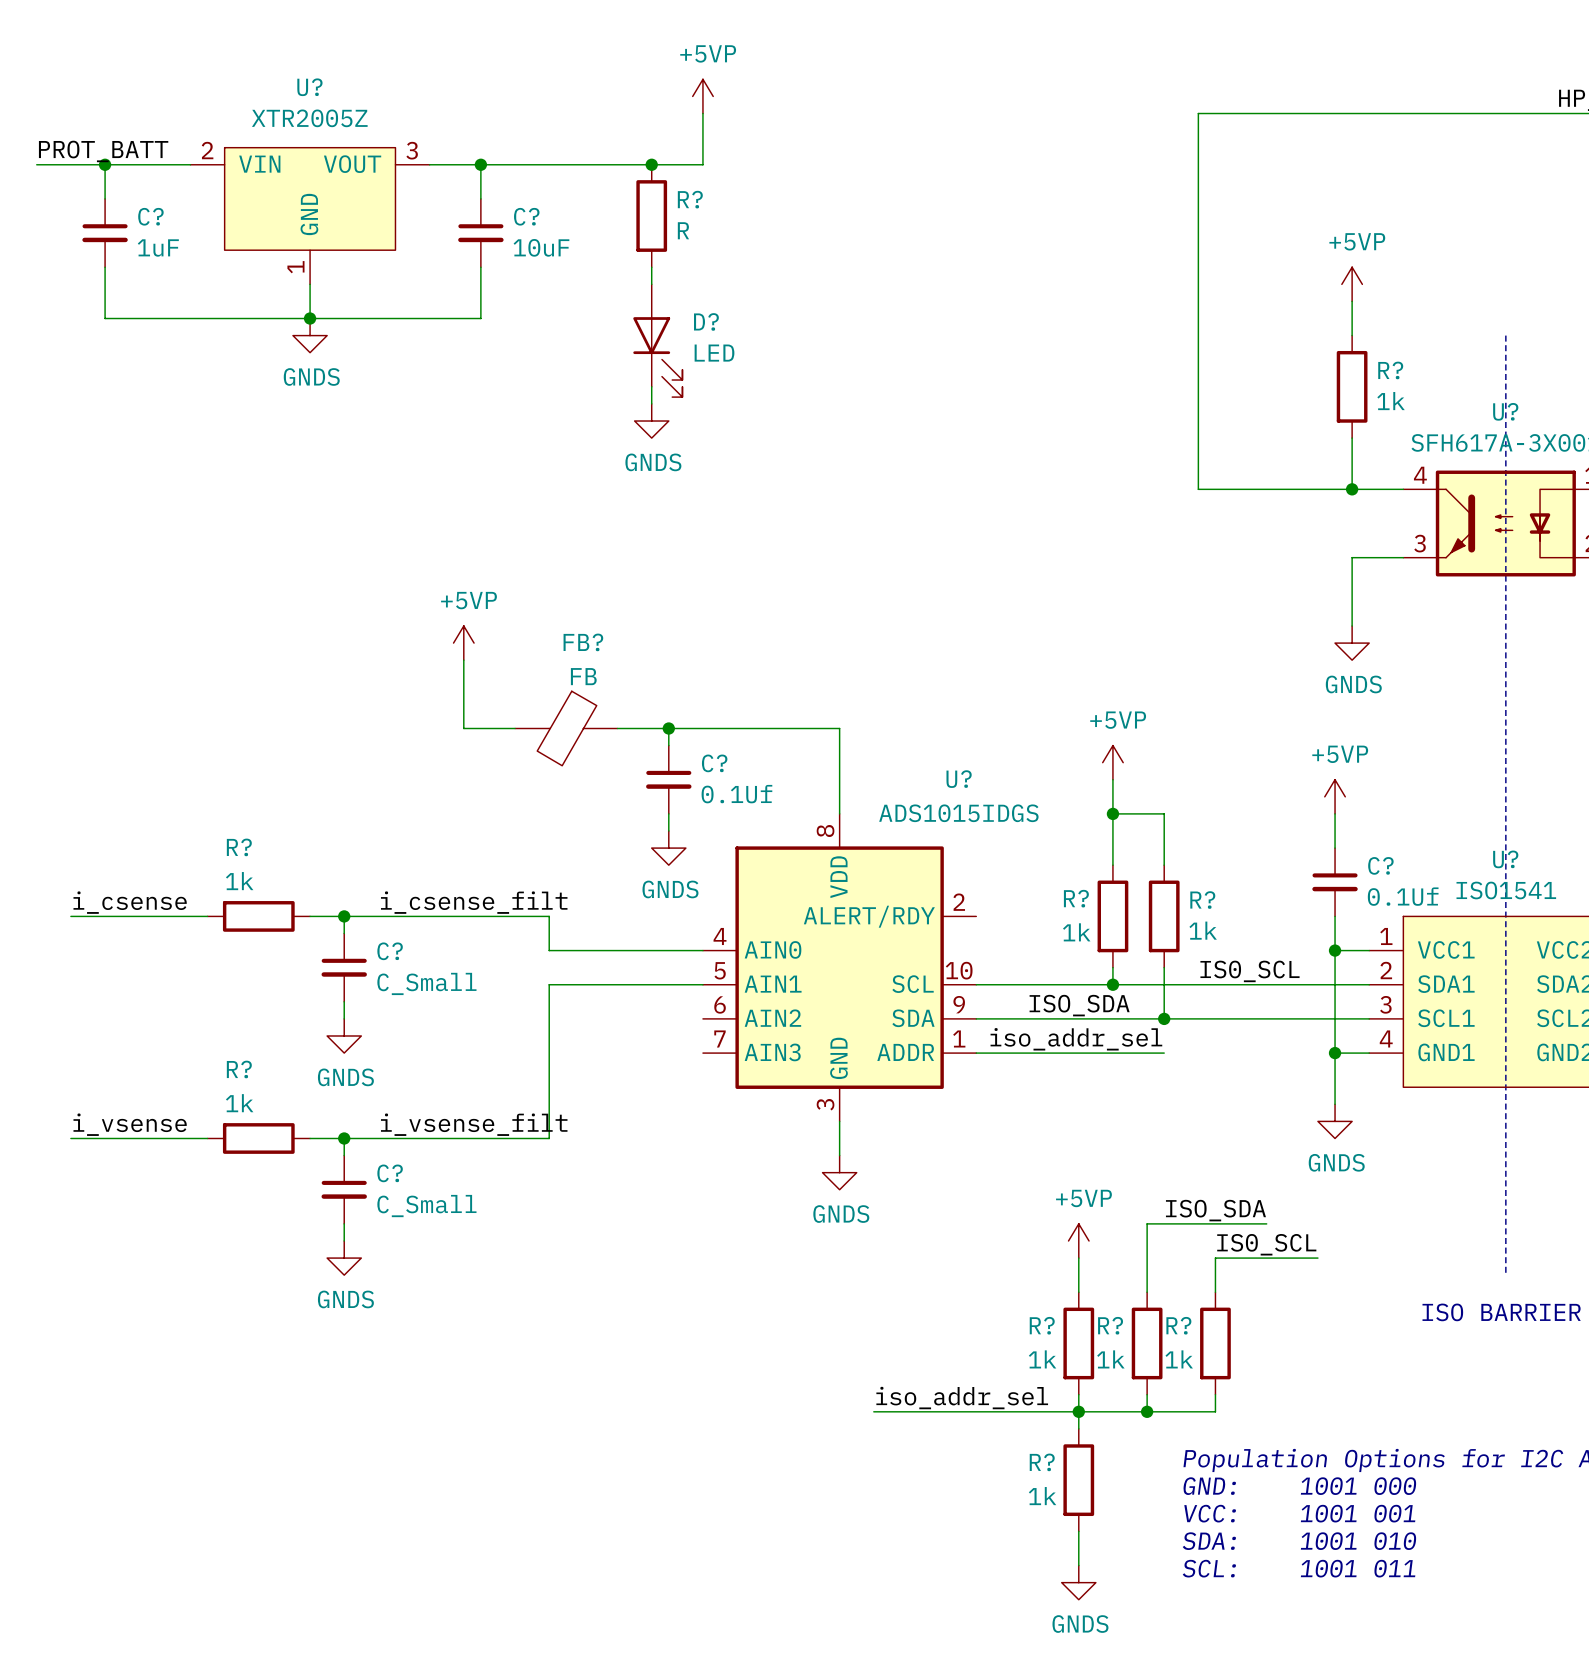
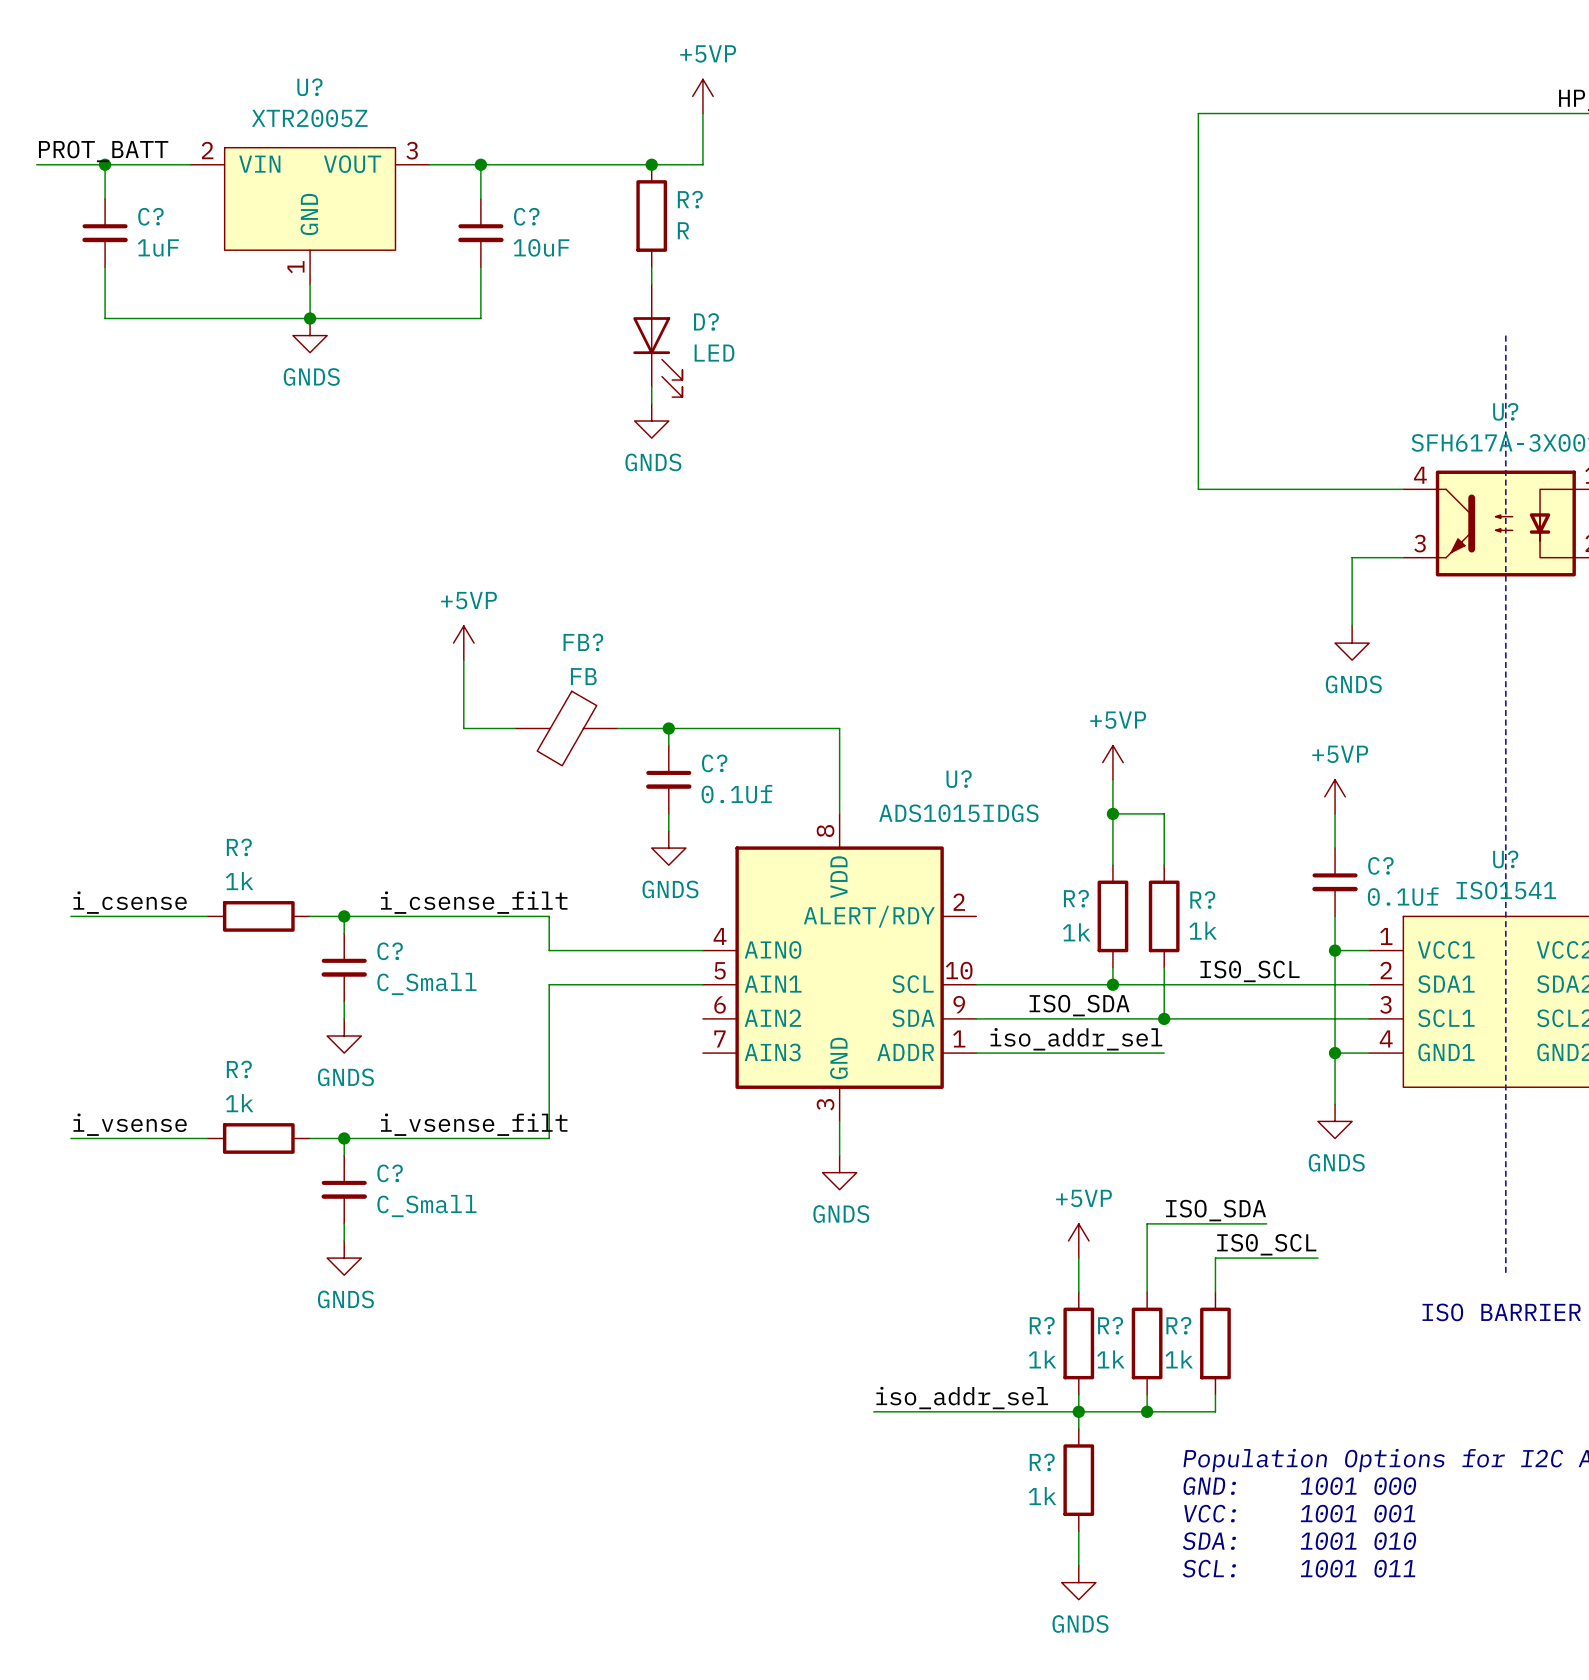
power symbol: +5VP (1352, 284) -> none
wire: (1352, 301) (1352, 335) -> none
R?: 1k (1352, 386) -> none
wire: (1352, 438) (1352, 489) -> none
junction: (1352, 489) -> none

